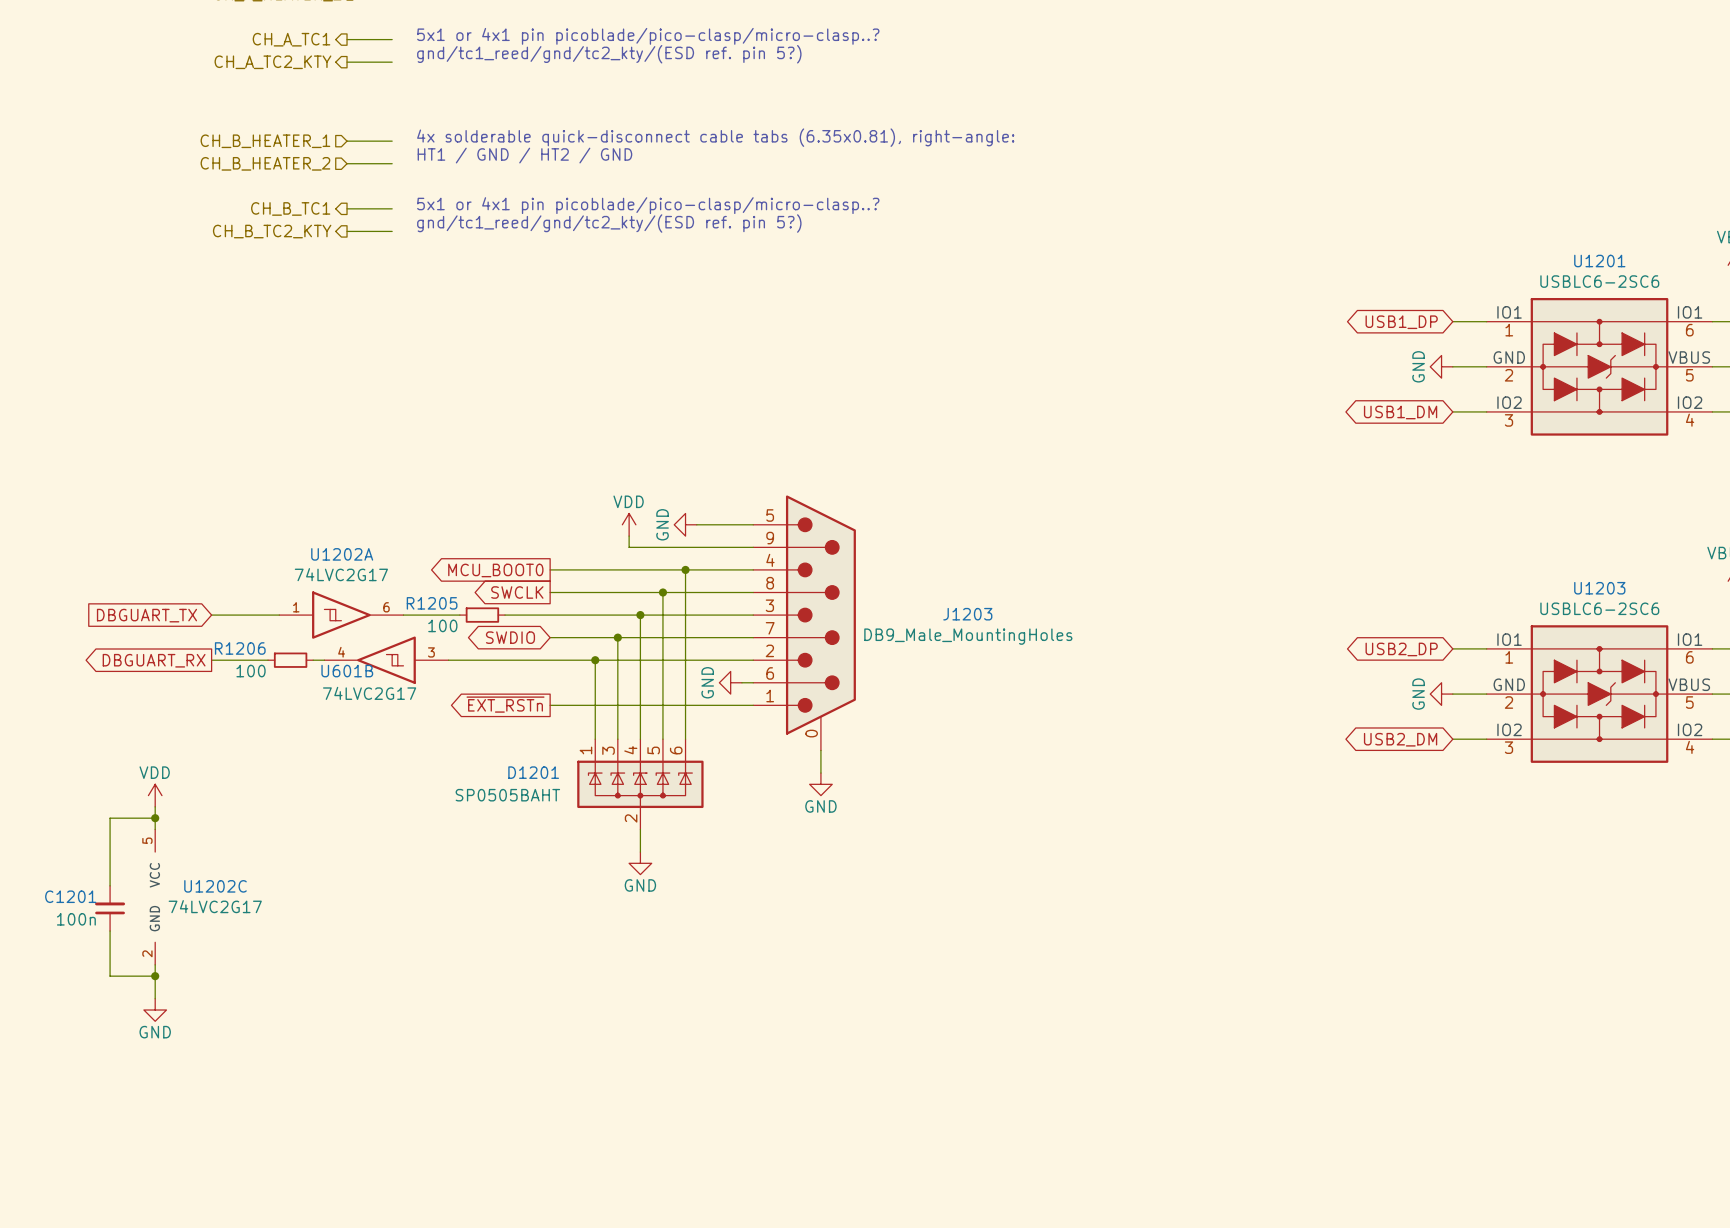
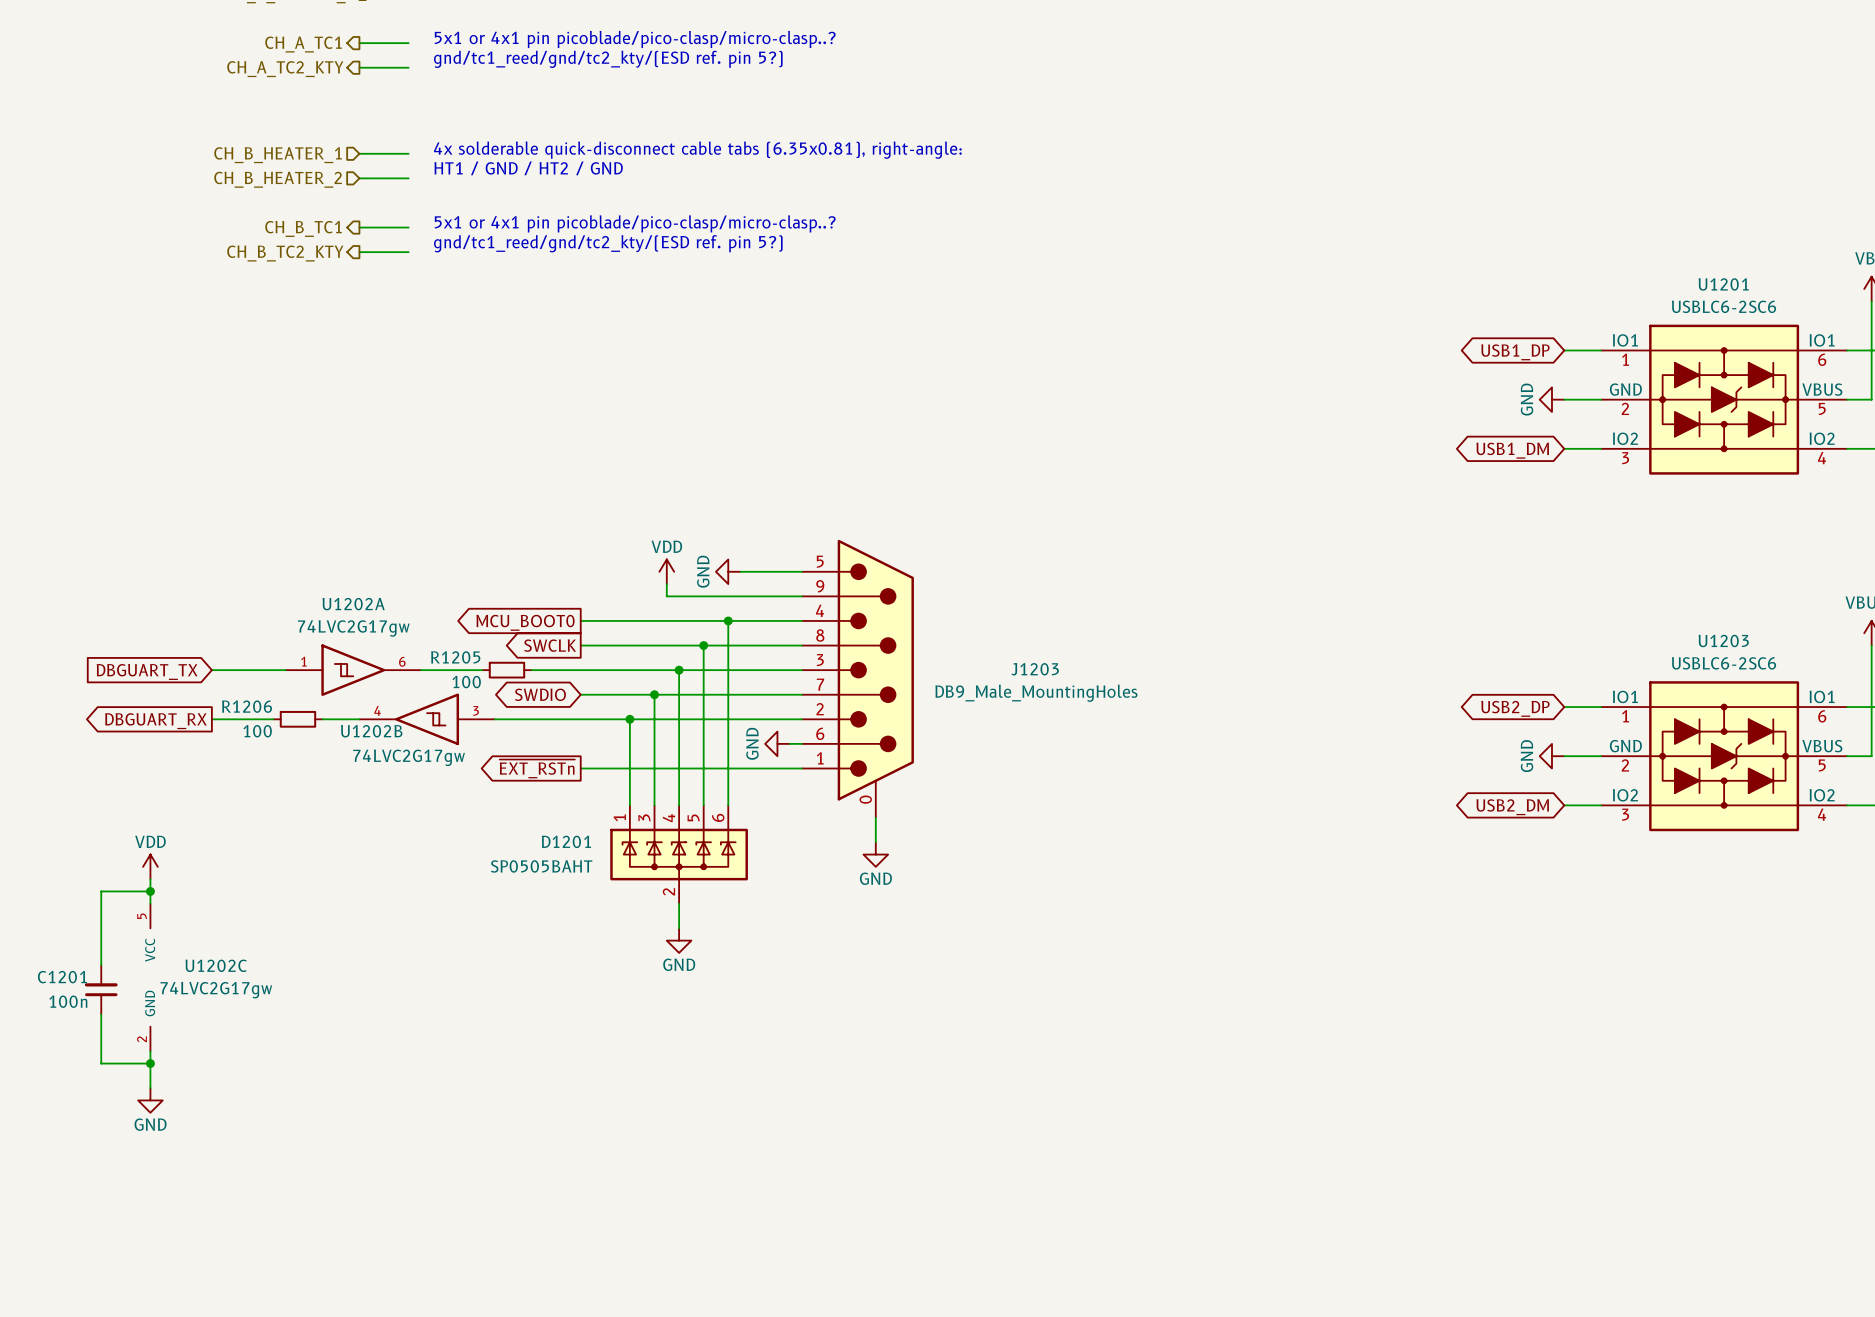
U1202A value: 74LVC2G17 (341, 574) -> 74LVC2G17gw (353, 628)
U601B: 74LVC2G17 (386, 660) -> none
U1202B: none -> 74LVC2G17gw (427, 719)
U1202C value: 74LVC2G17 (215, 906) -> 74LVC2G17gw (216, 990)

